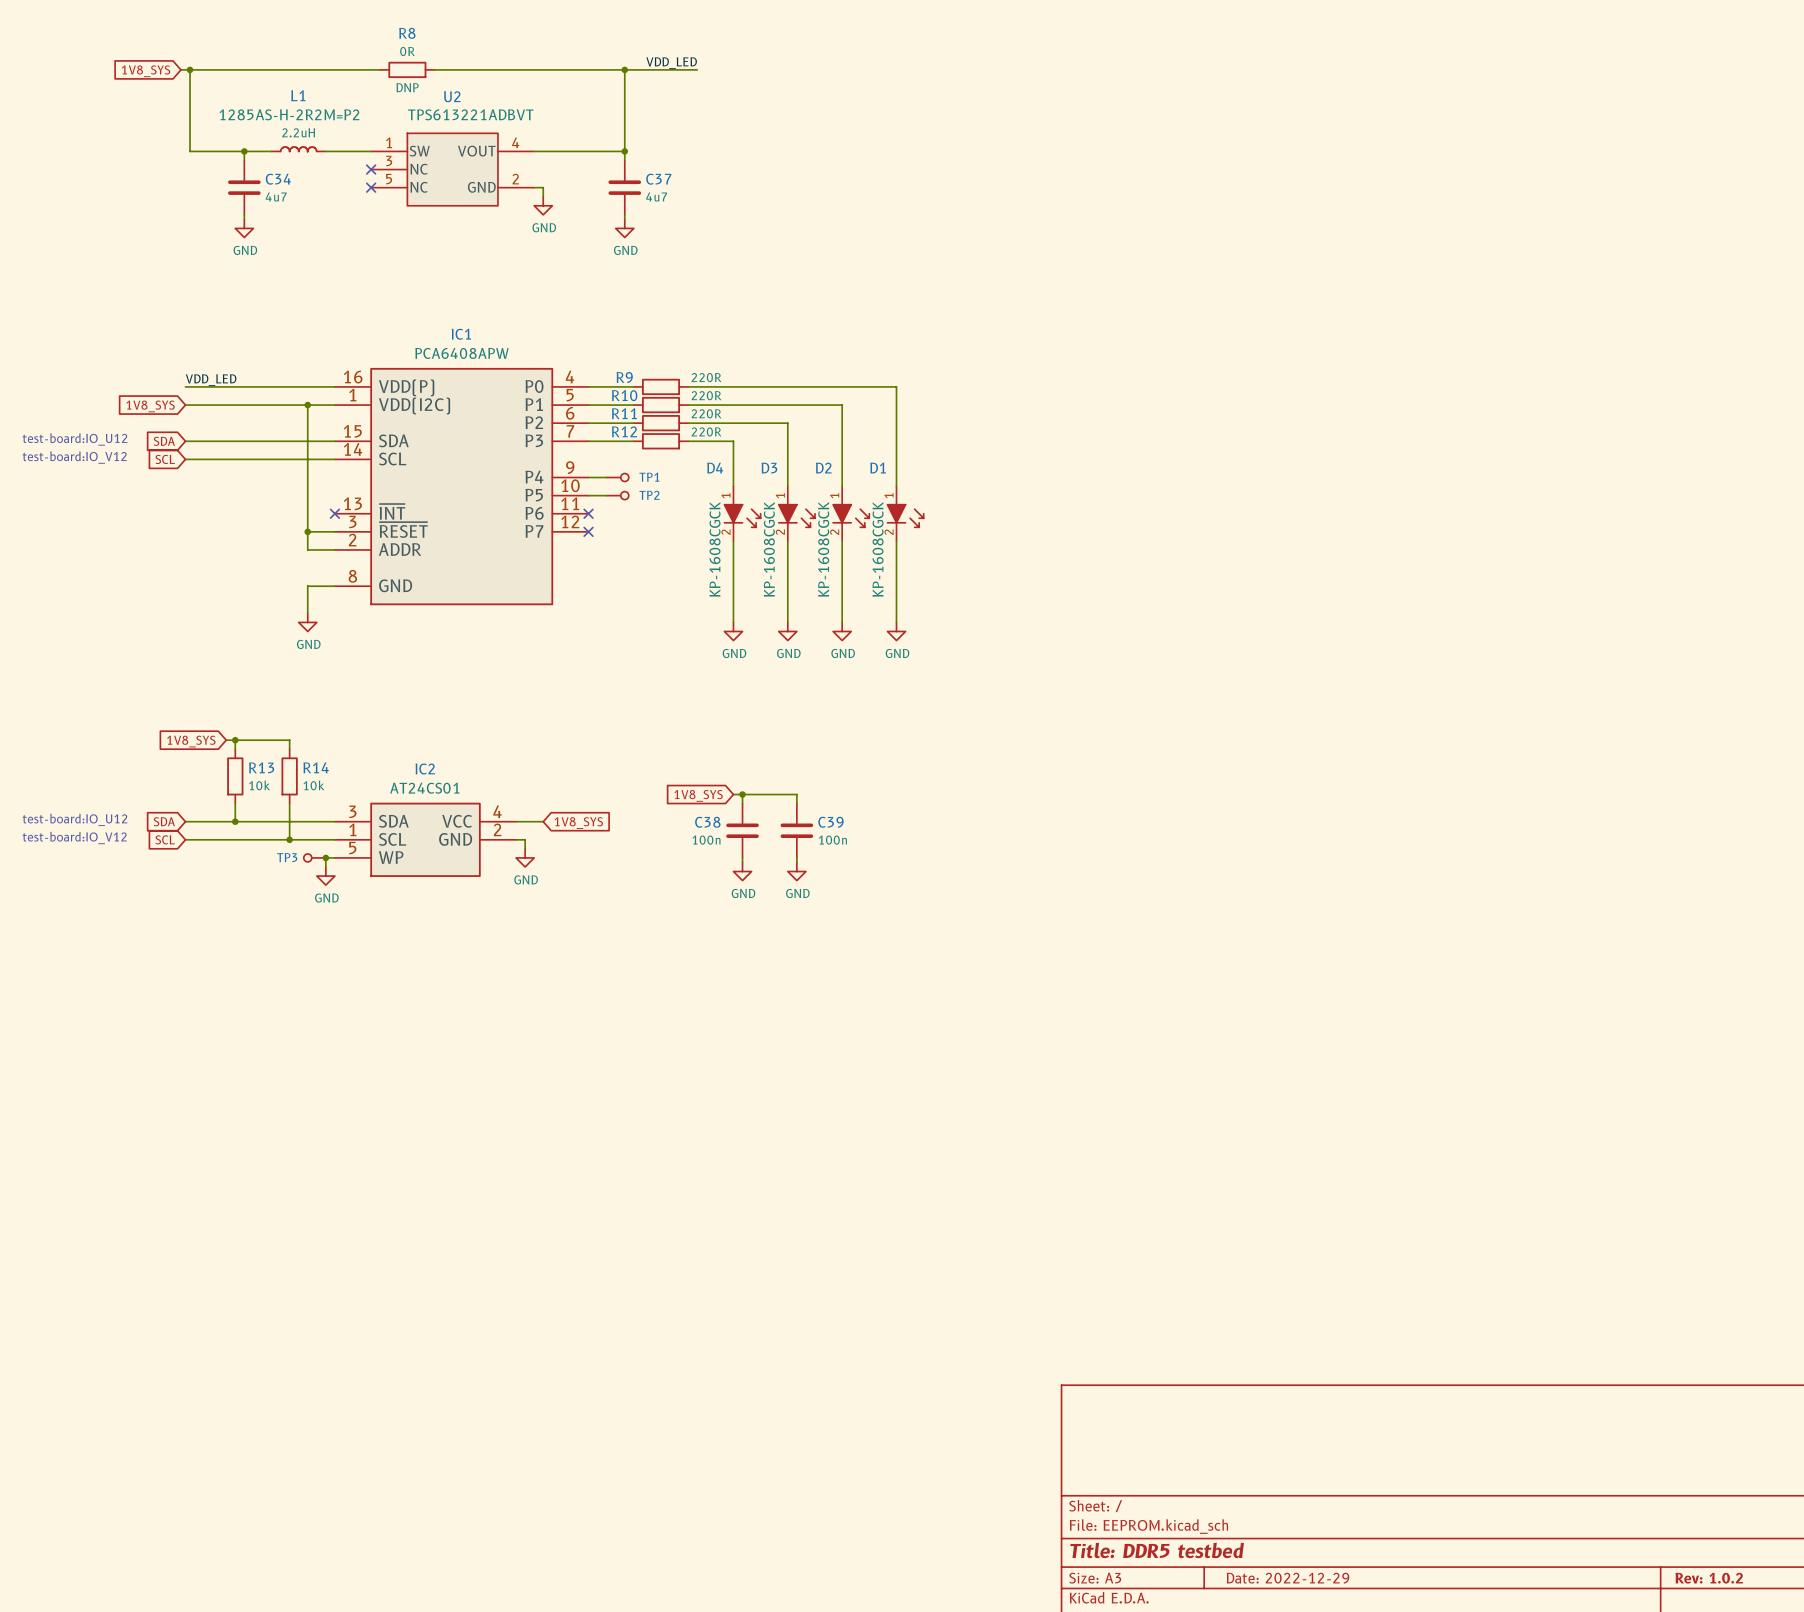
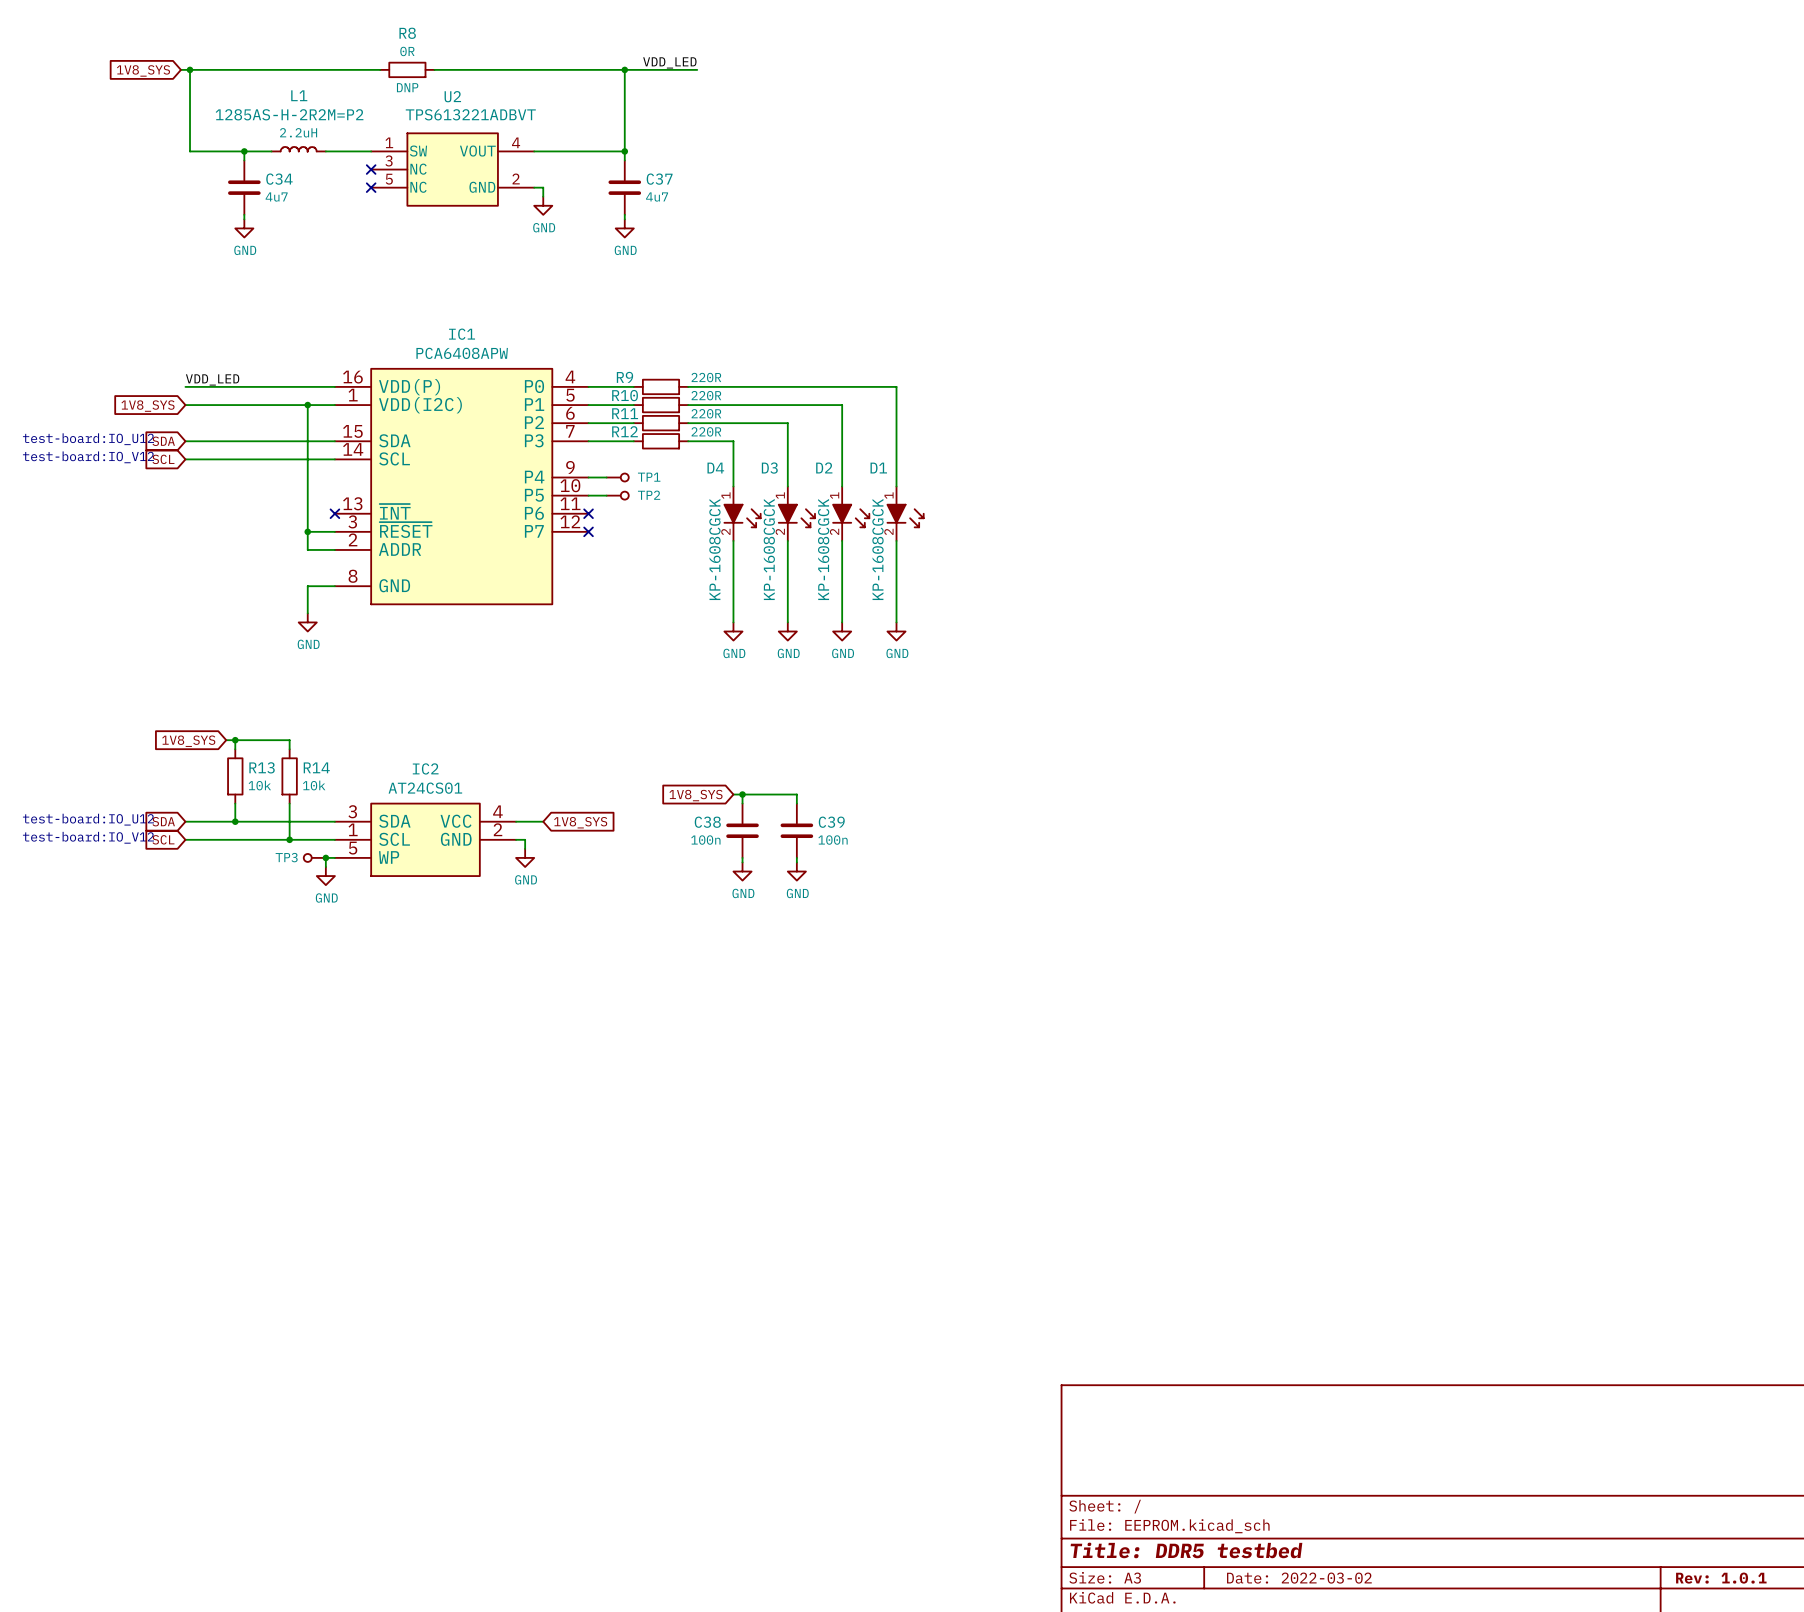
title block: Date: 2022-12-29 (1288, 1578) -> Date: 2022-03-02 (1299, 1578)
title block: Rev: 1.0.2 (1709, 1578) -> Rev: 1.0.1 (1721, 1578)

